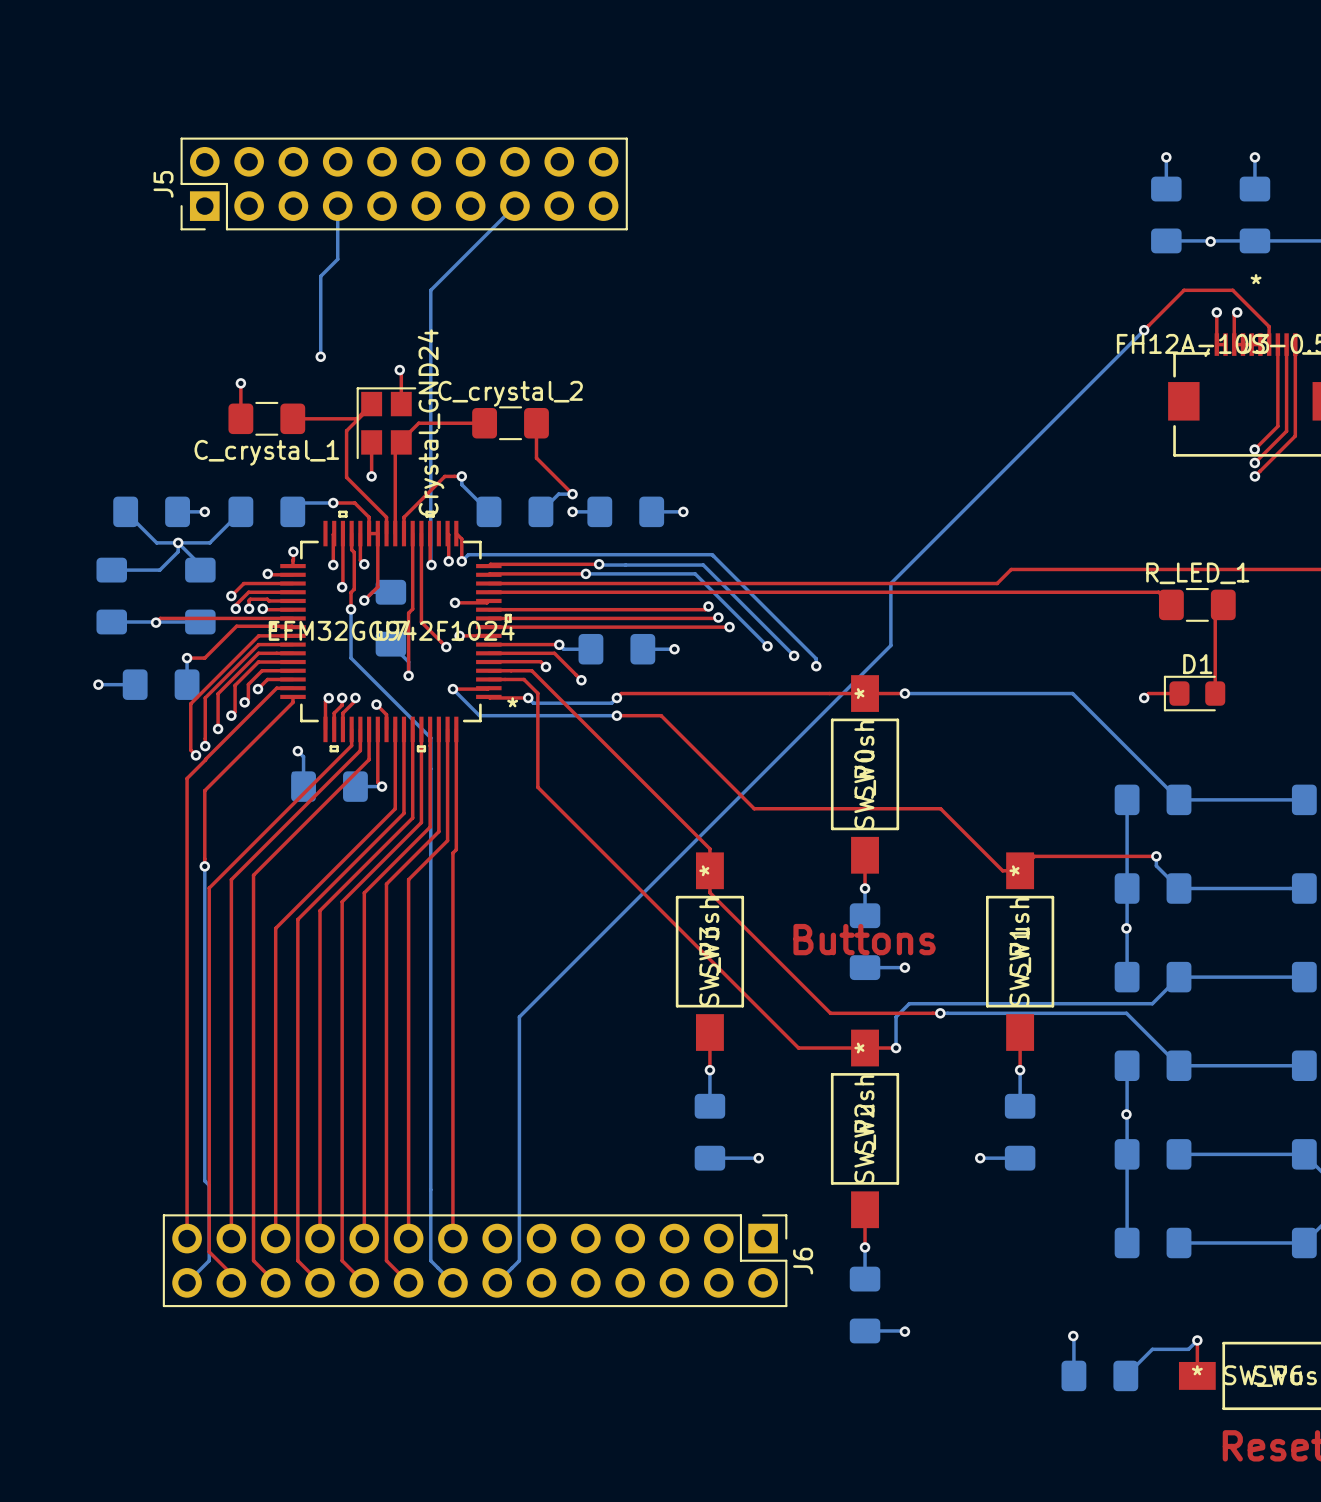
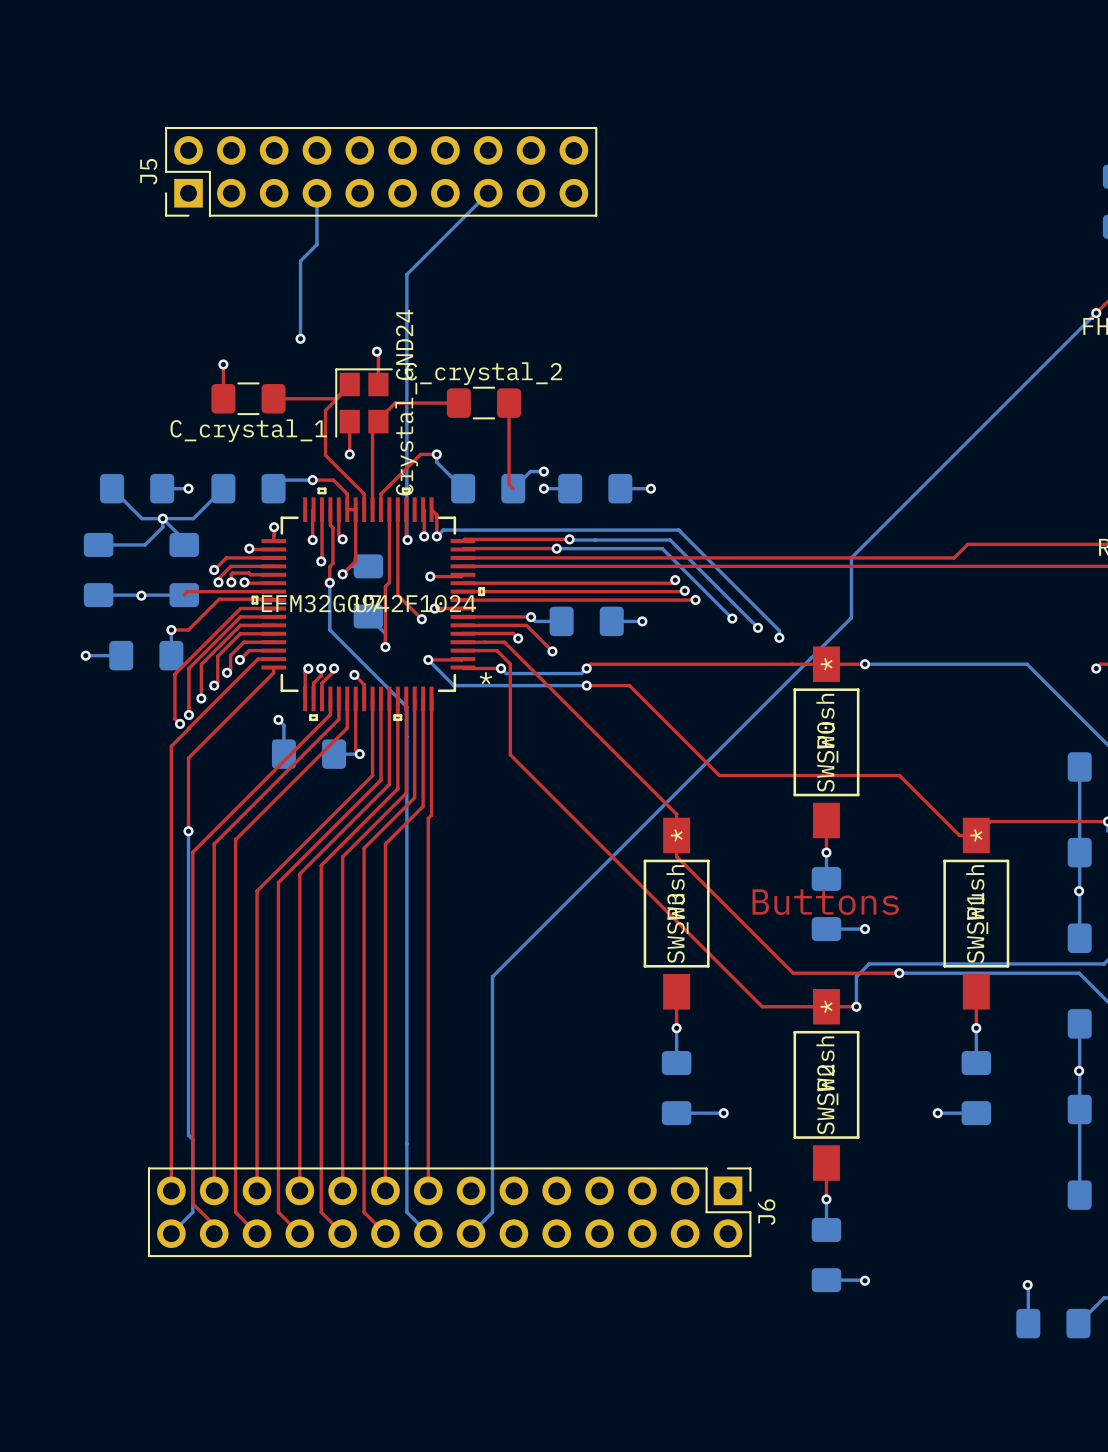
top track: (536, 458) (572, 494) -> (509, 436) (509, 484) (513, 488)
top track: (203, 618) (160, 618) (156, 622) -> (187, 591) (184, 595)

